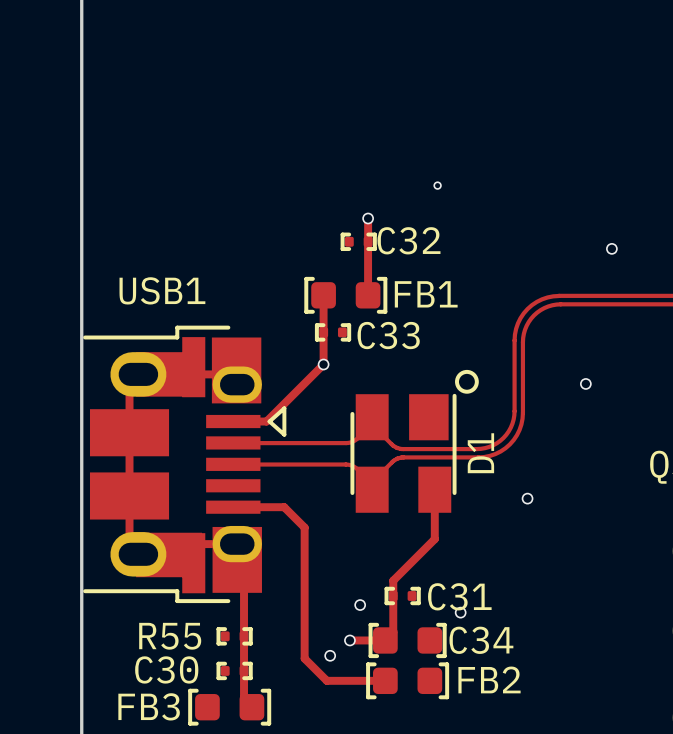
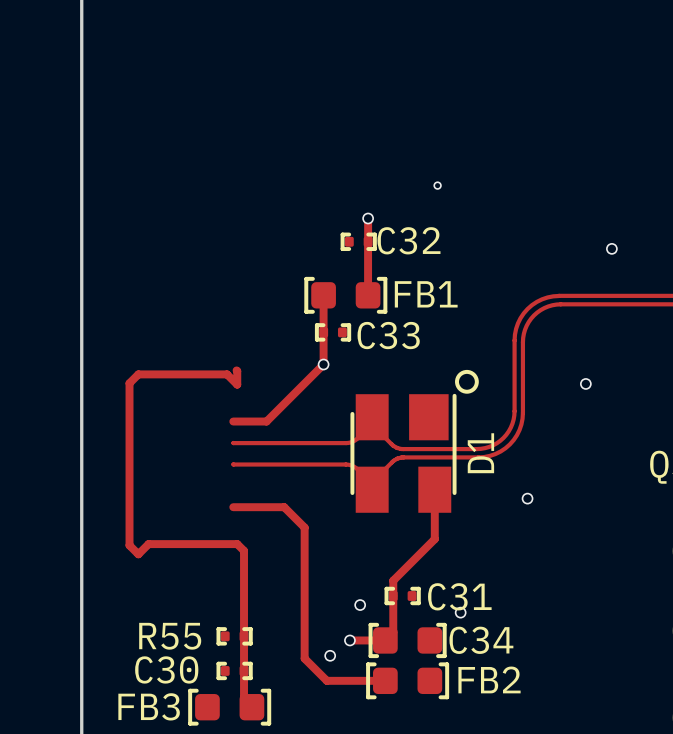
USB1: (184, 464) -> none

